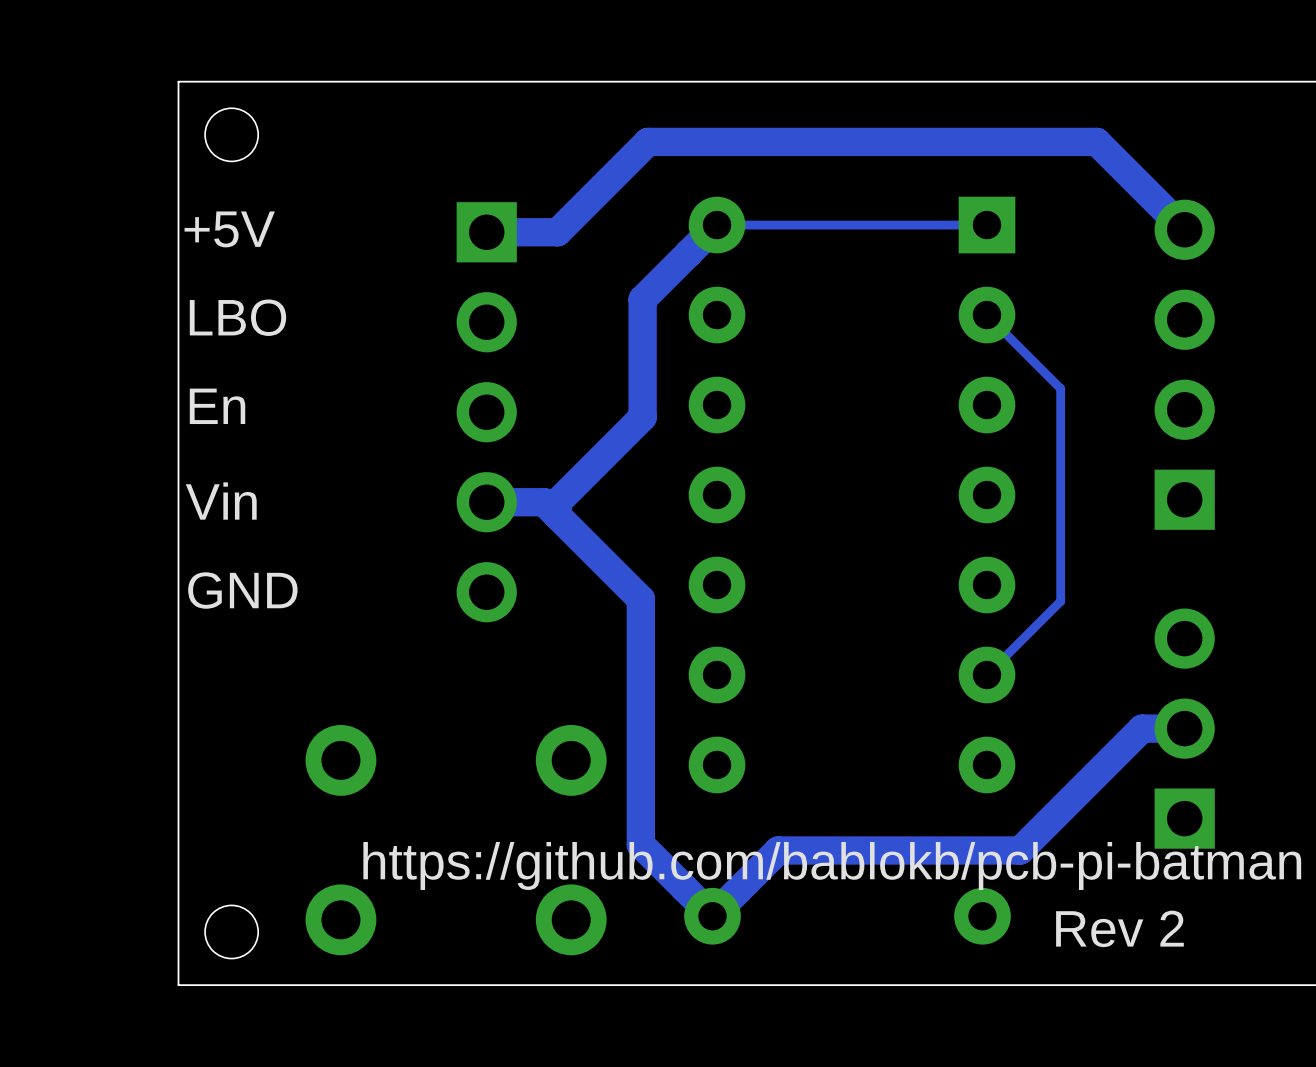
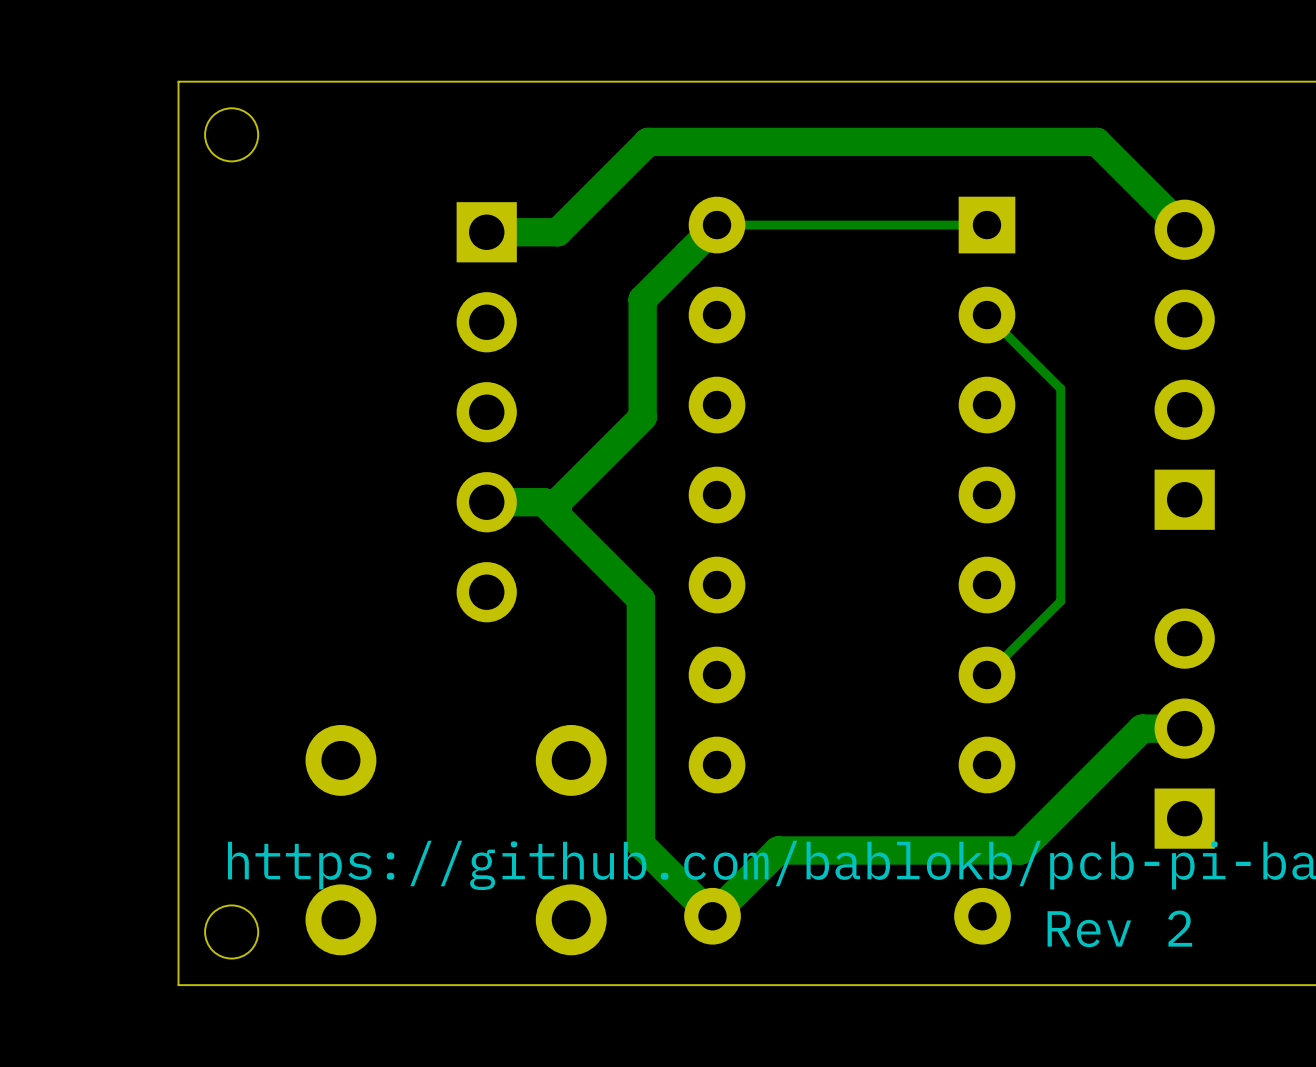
text: +5V (229, 229) -> none
text: LBO (237, 317) -> none
text: En (217, 406) -> none
text: Vin (221, 501) -> none
text: GND (242, 590) -> none

